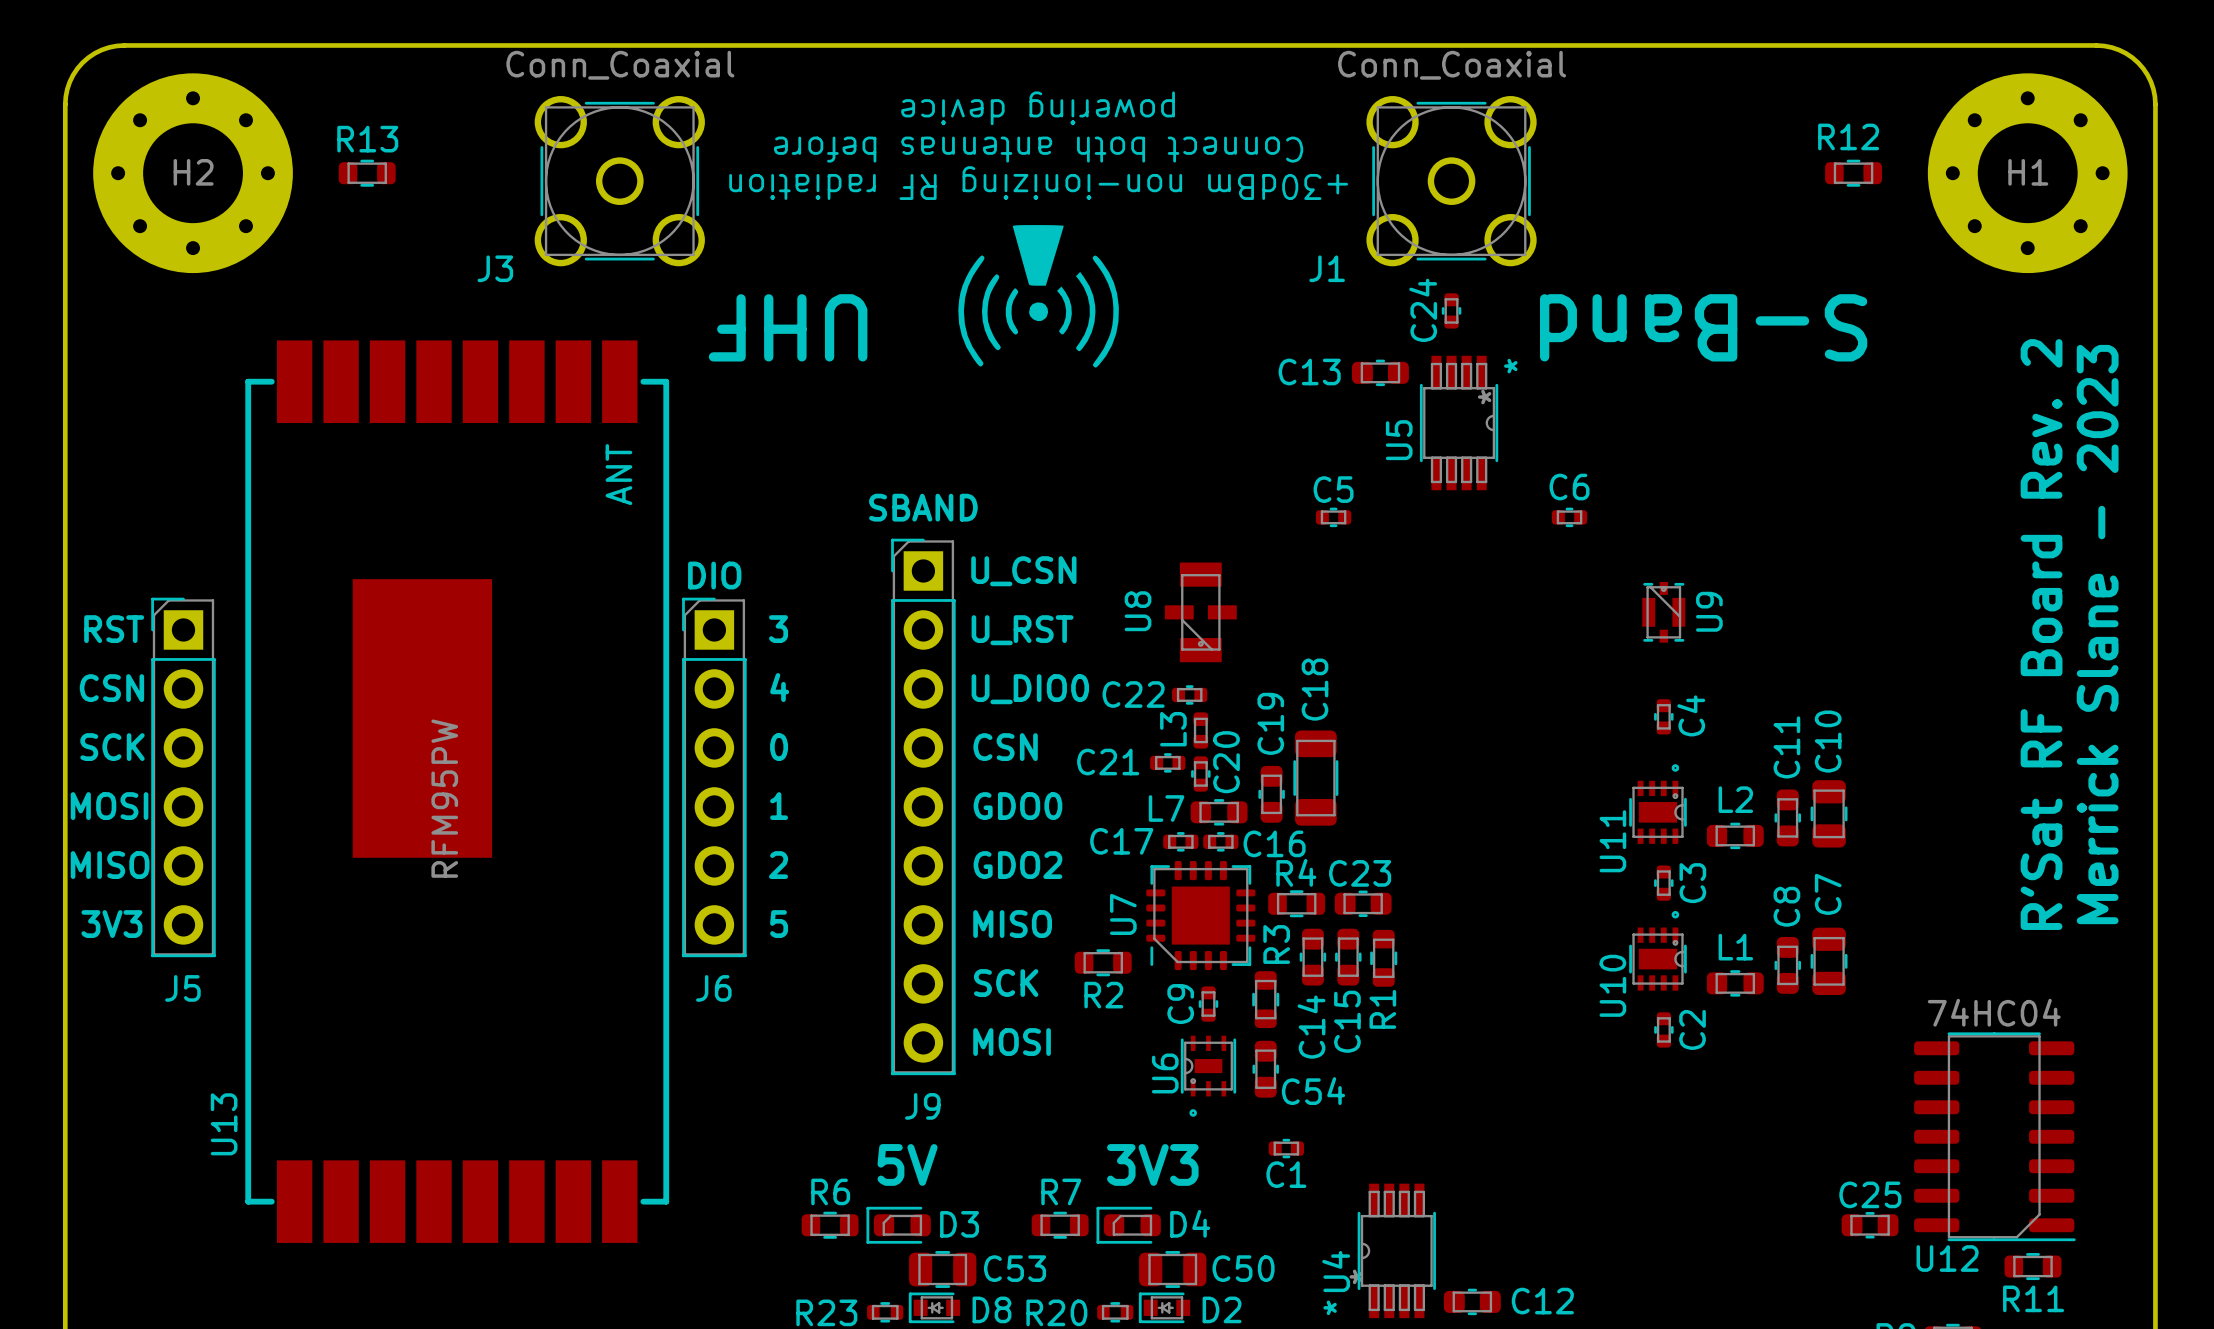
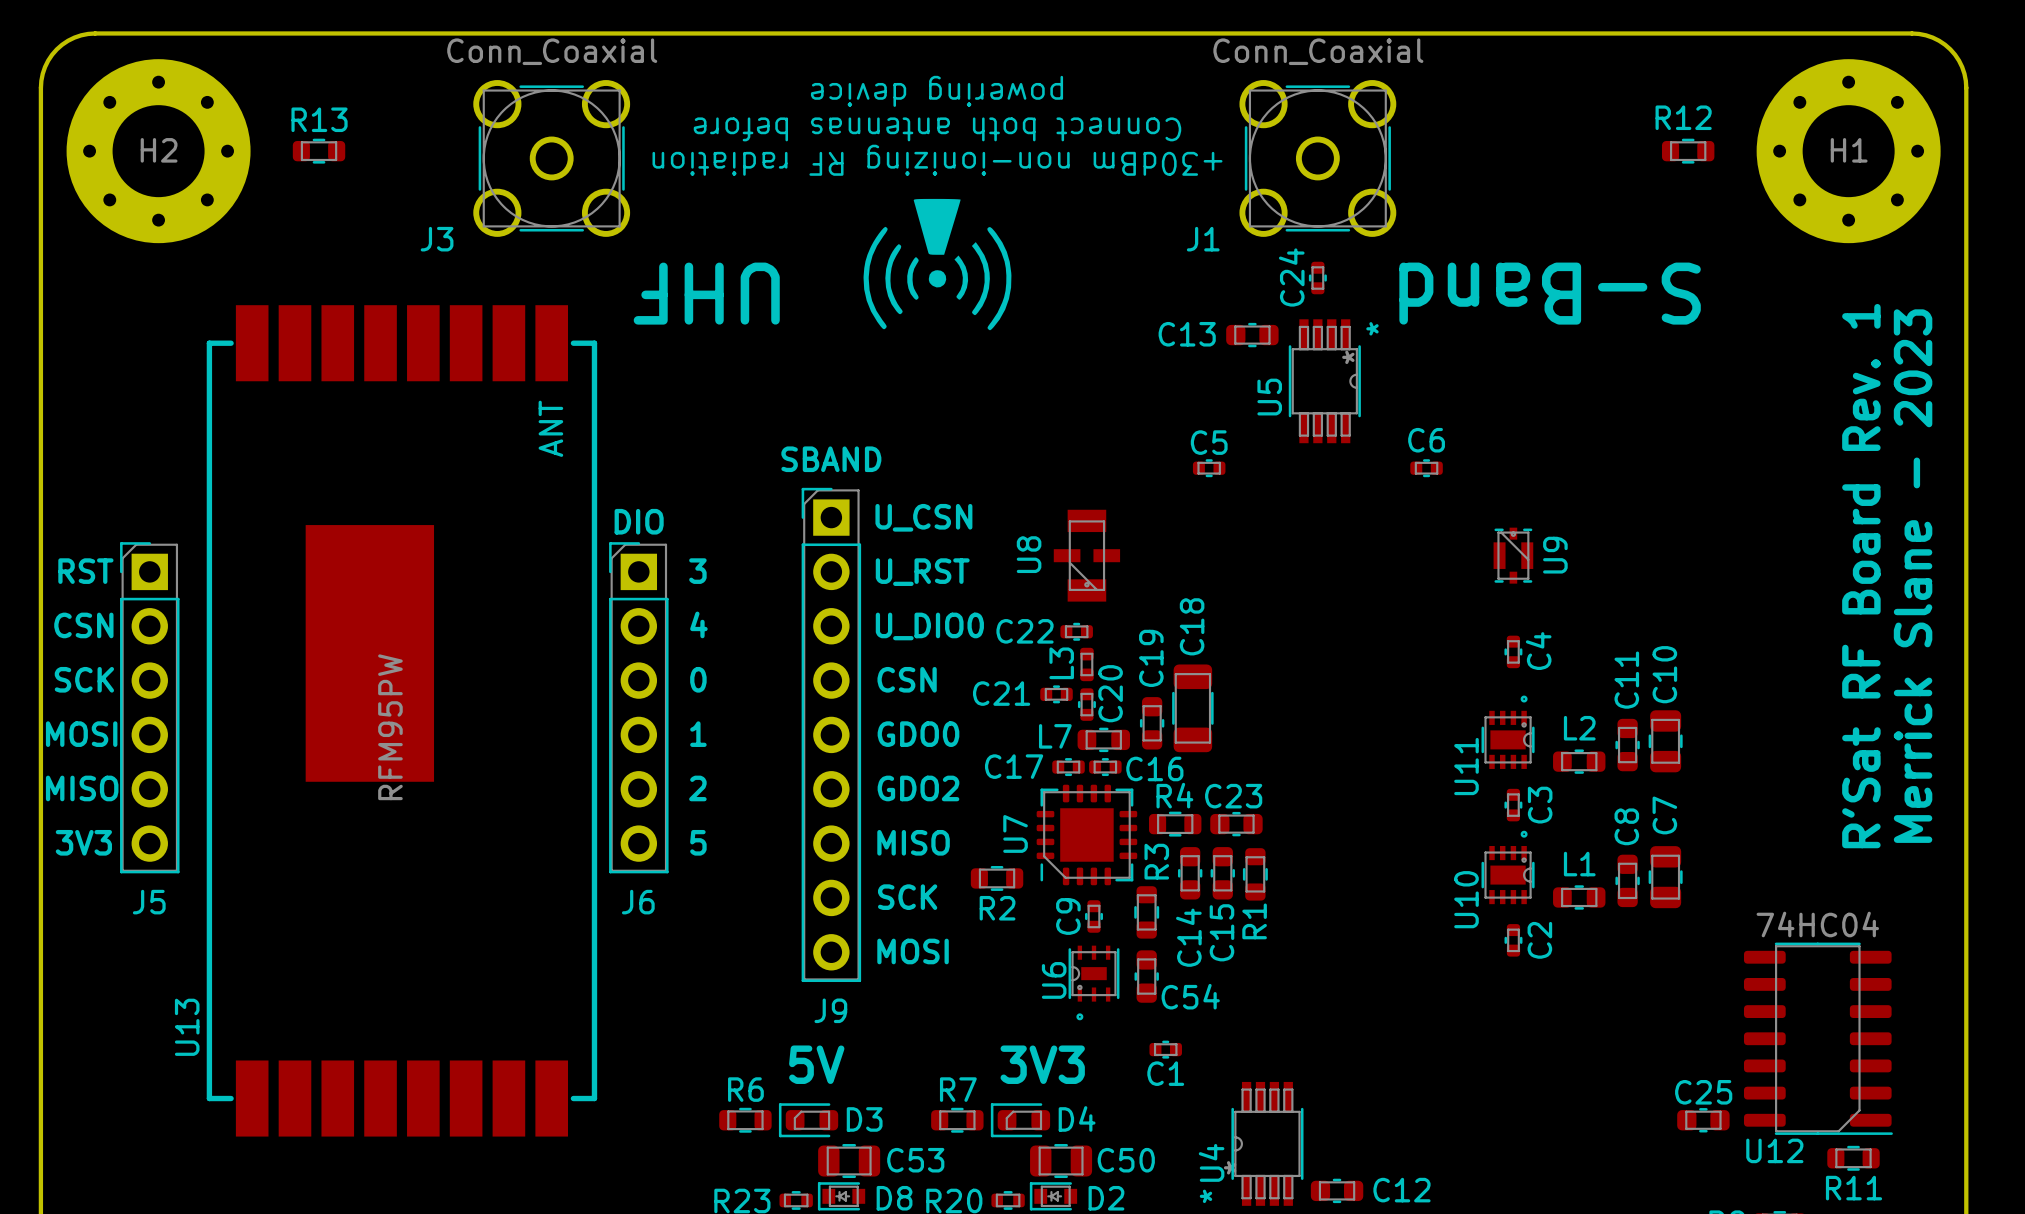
text: R'Sat RF Board Rev. 2 (2041, 634) -> R'Sat RF Board Rev. 1 (1861, 576)

